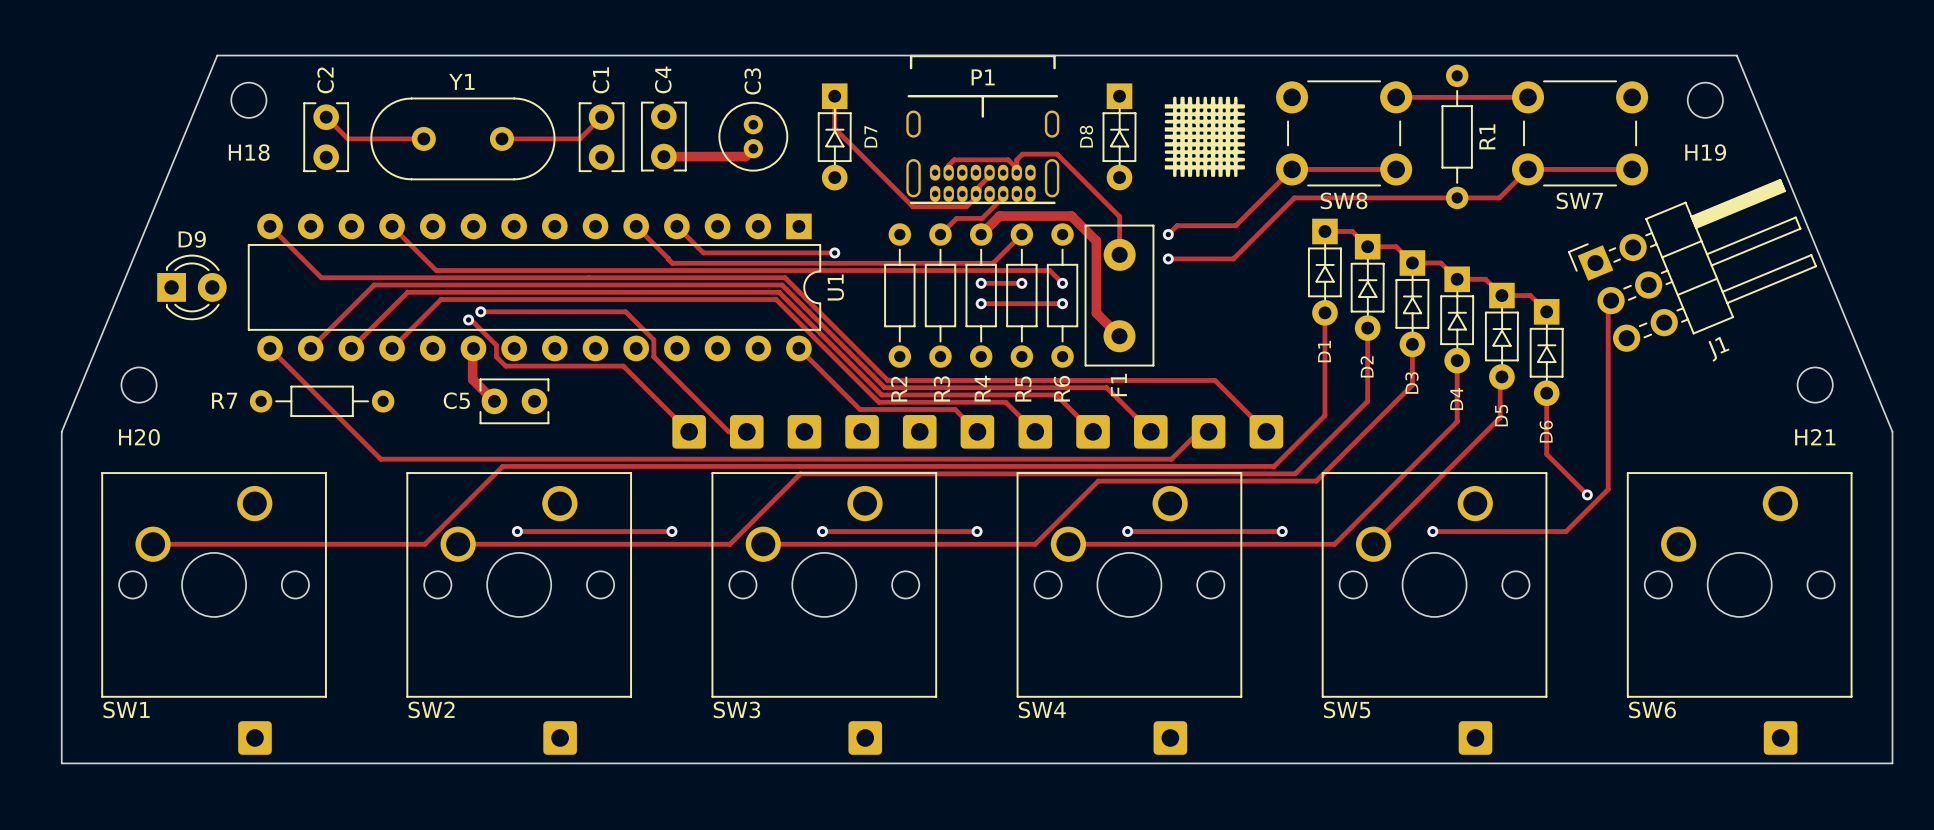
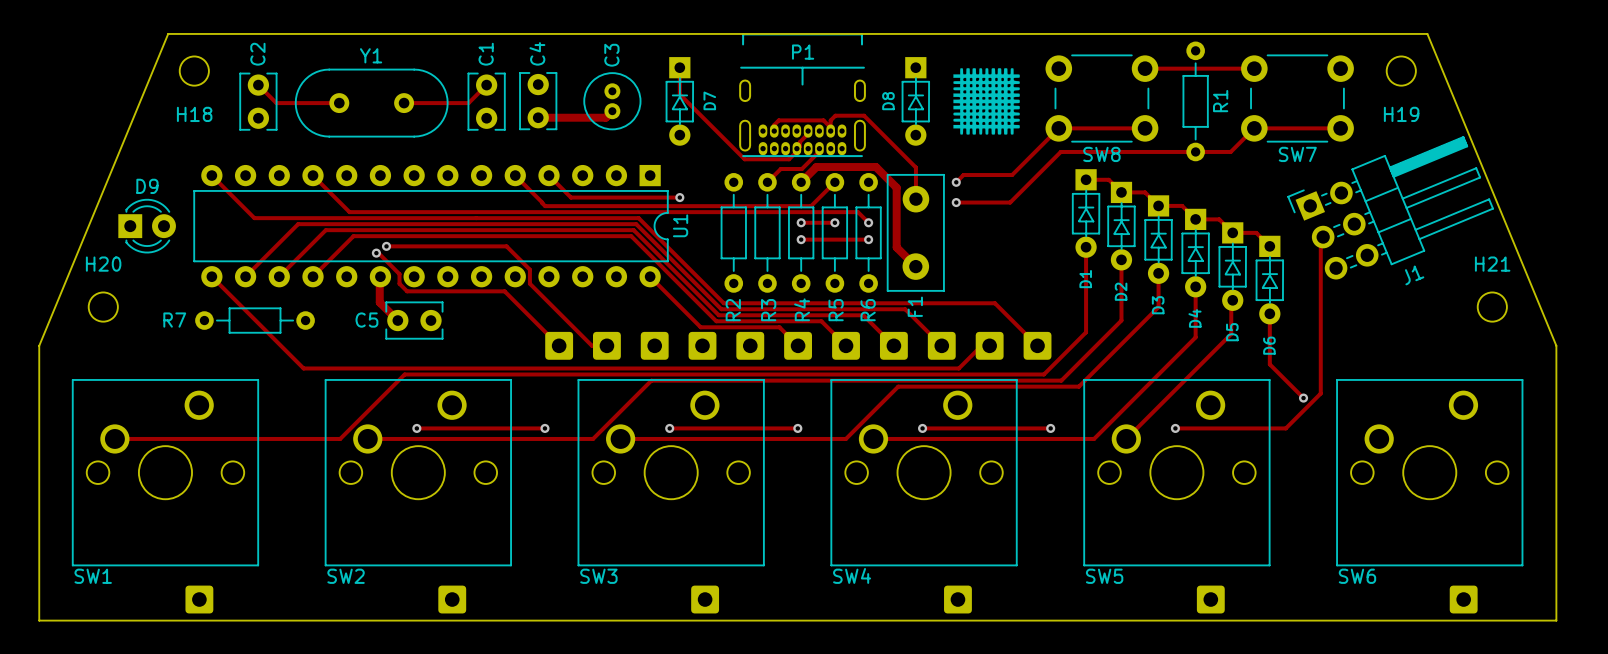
H20 name position: H20 (139, 437) -> H20 (103, 264)
H21 name position: H21 (1815, 437) -> H21 (1492, 264)

